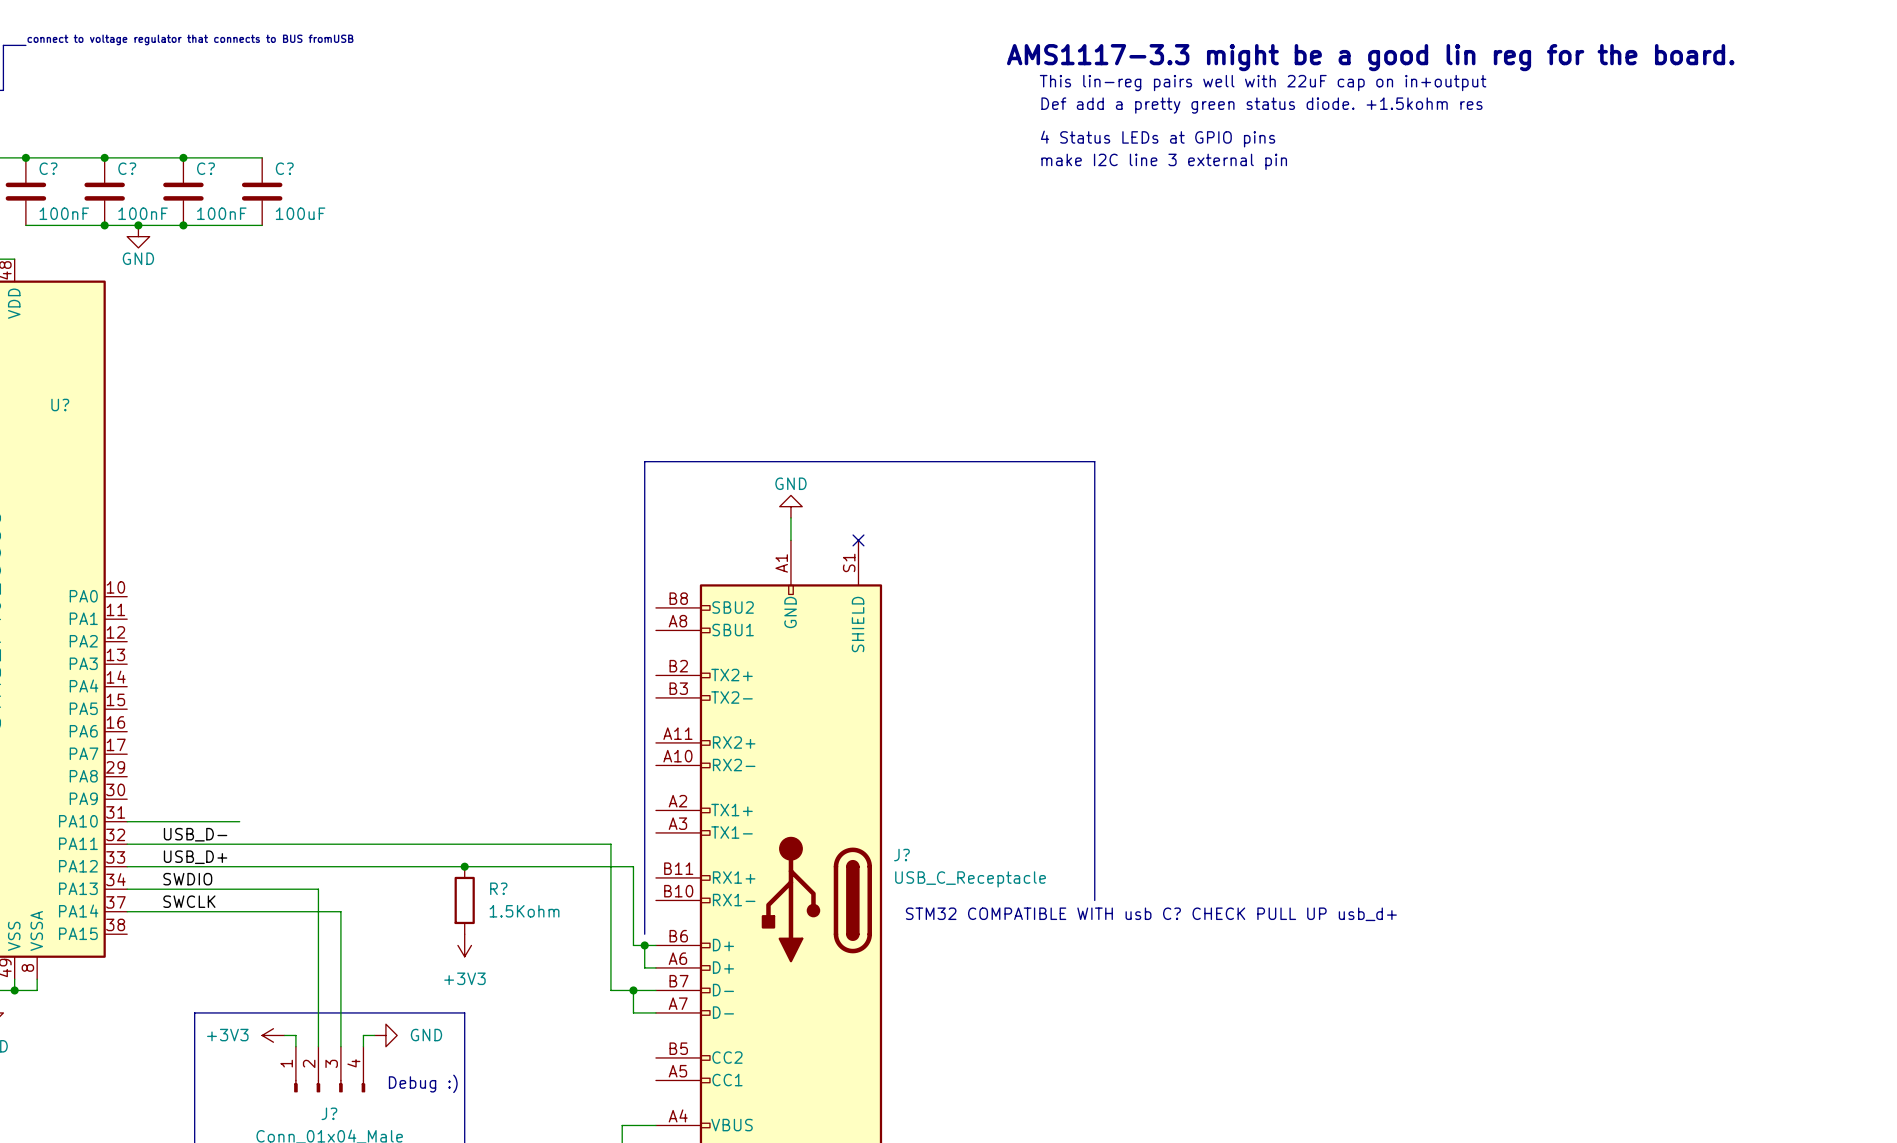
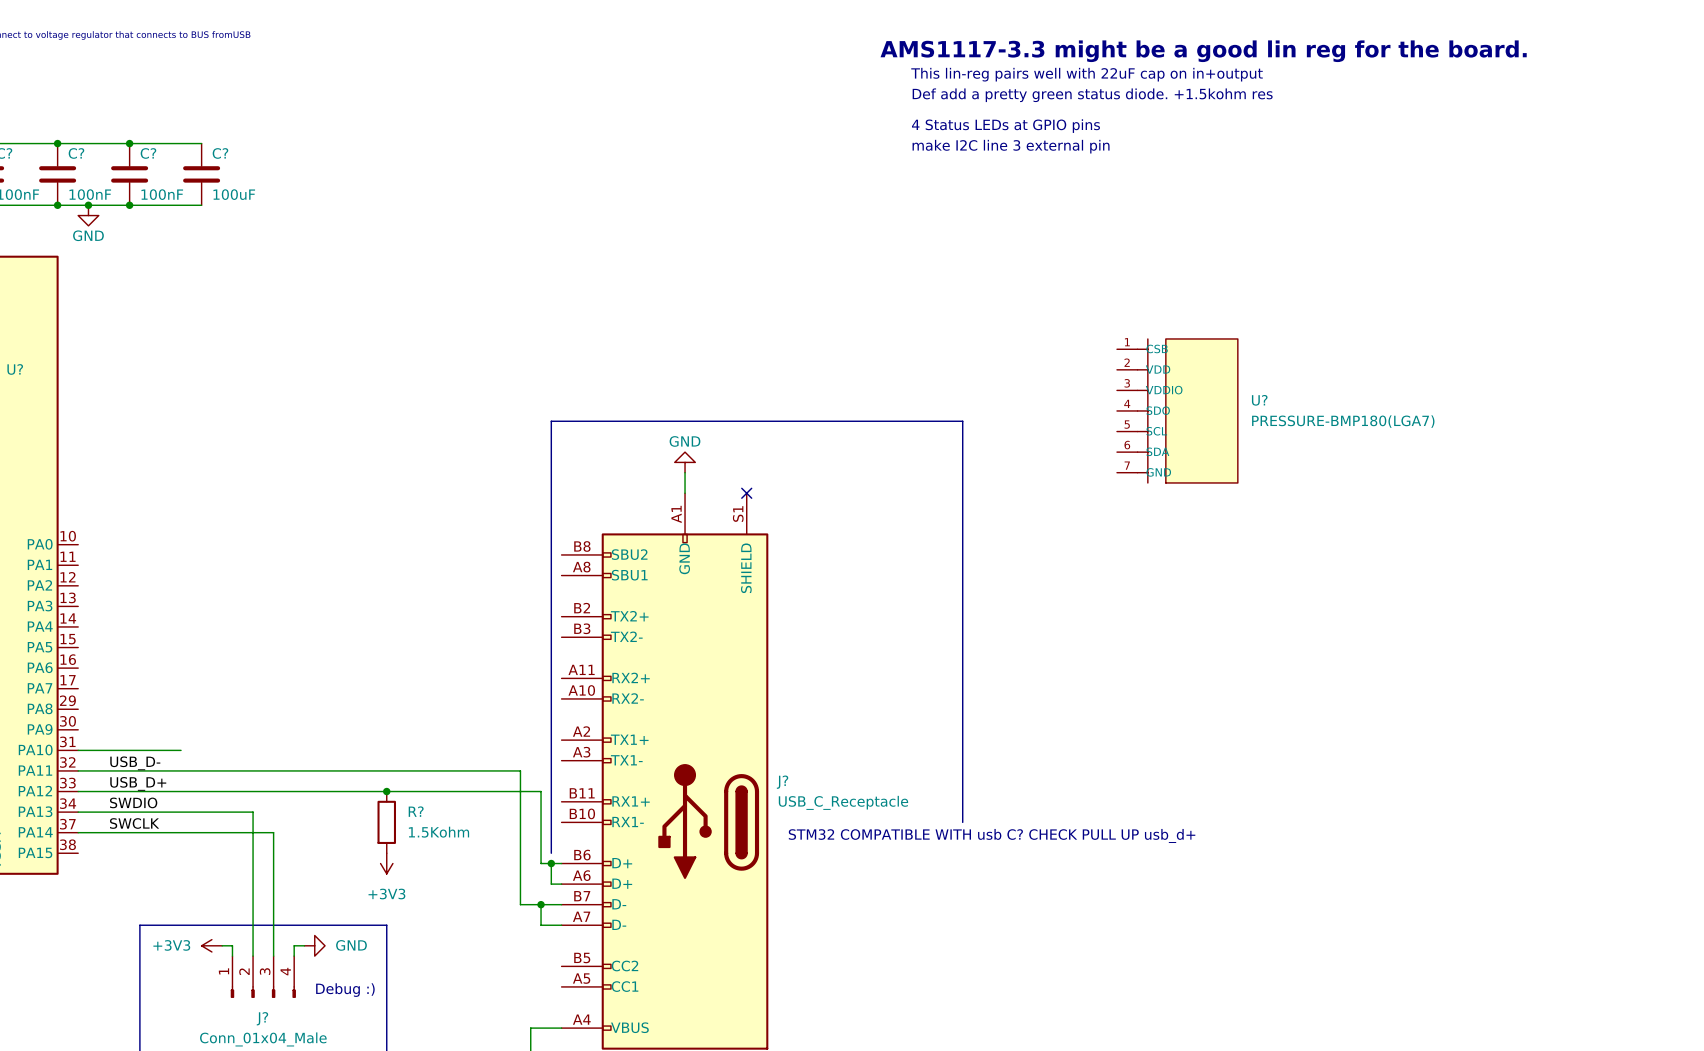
U?: none -> PRESSURE-BMP180(LGA7) (1177, 410)

